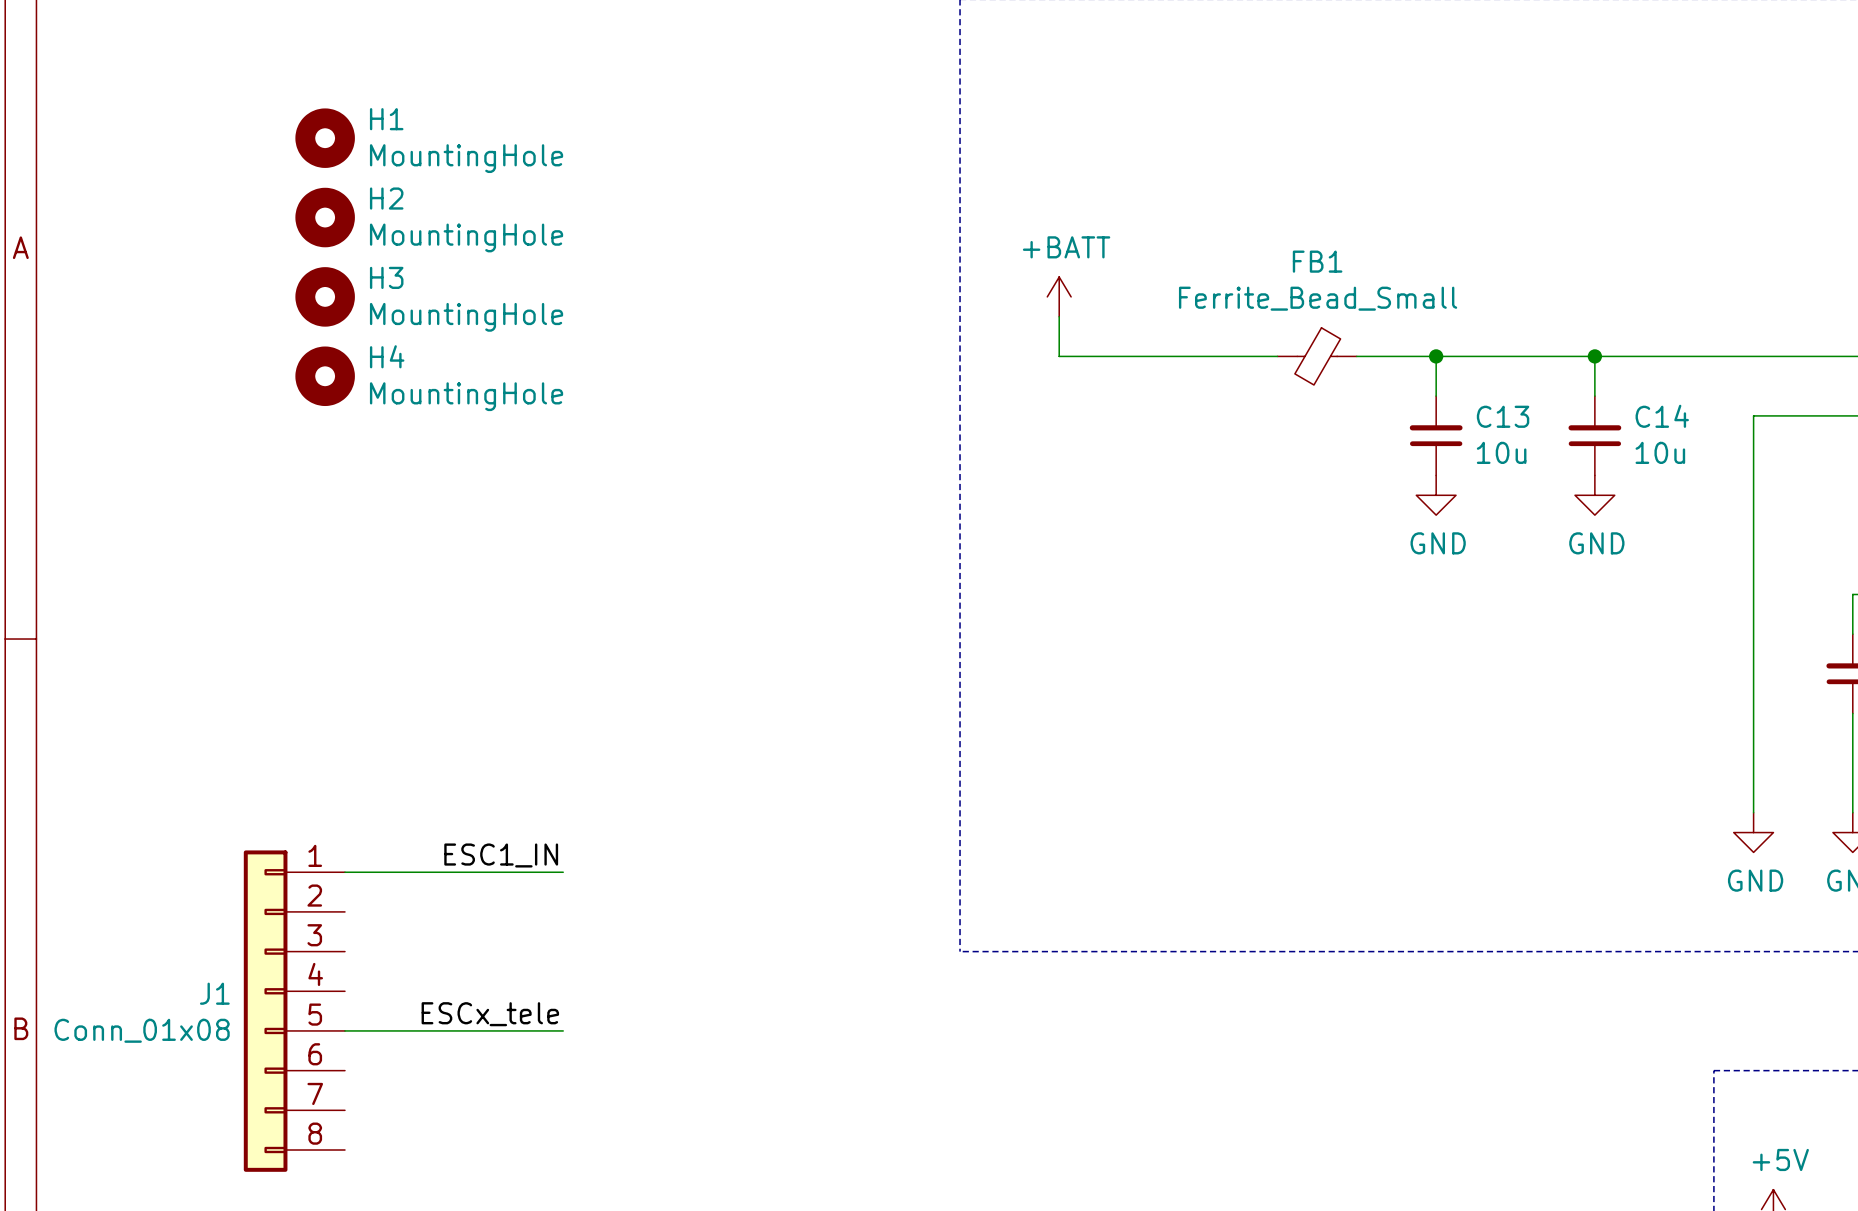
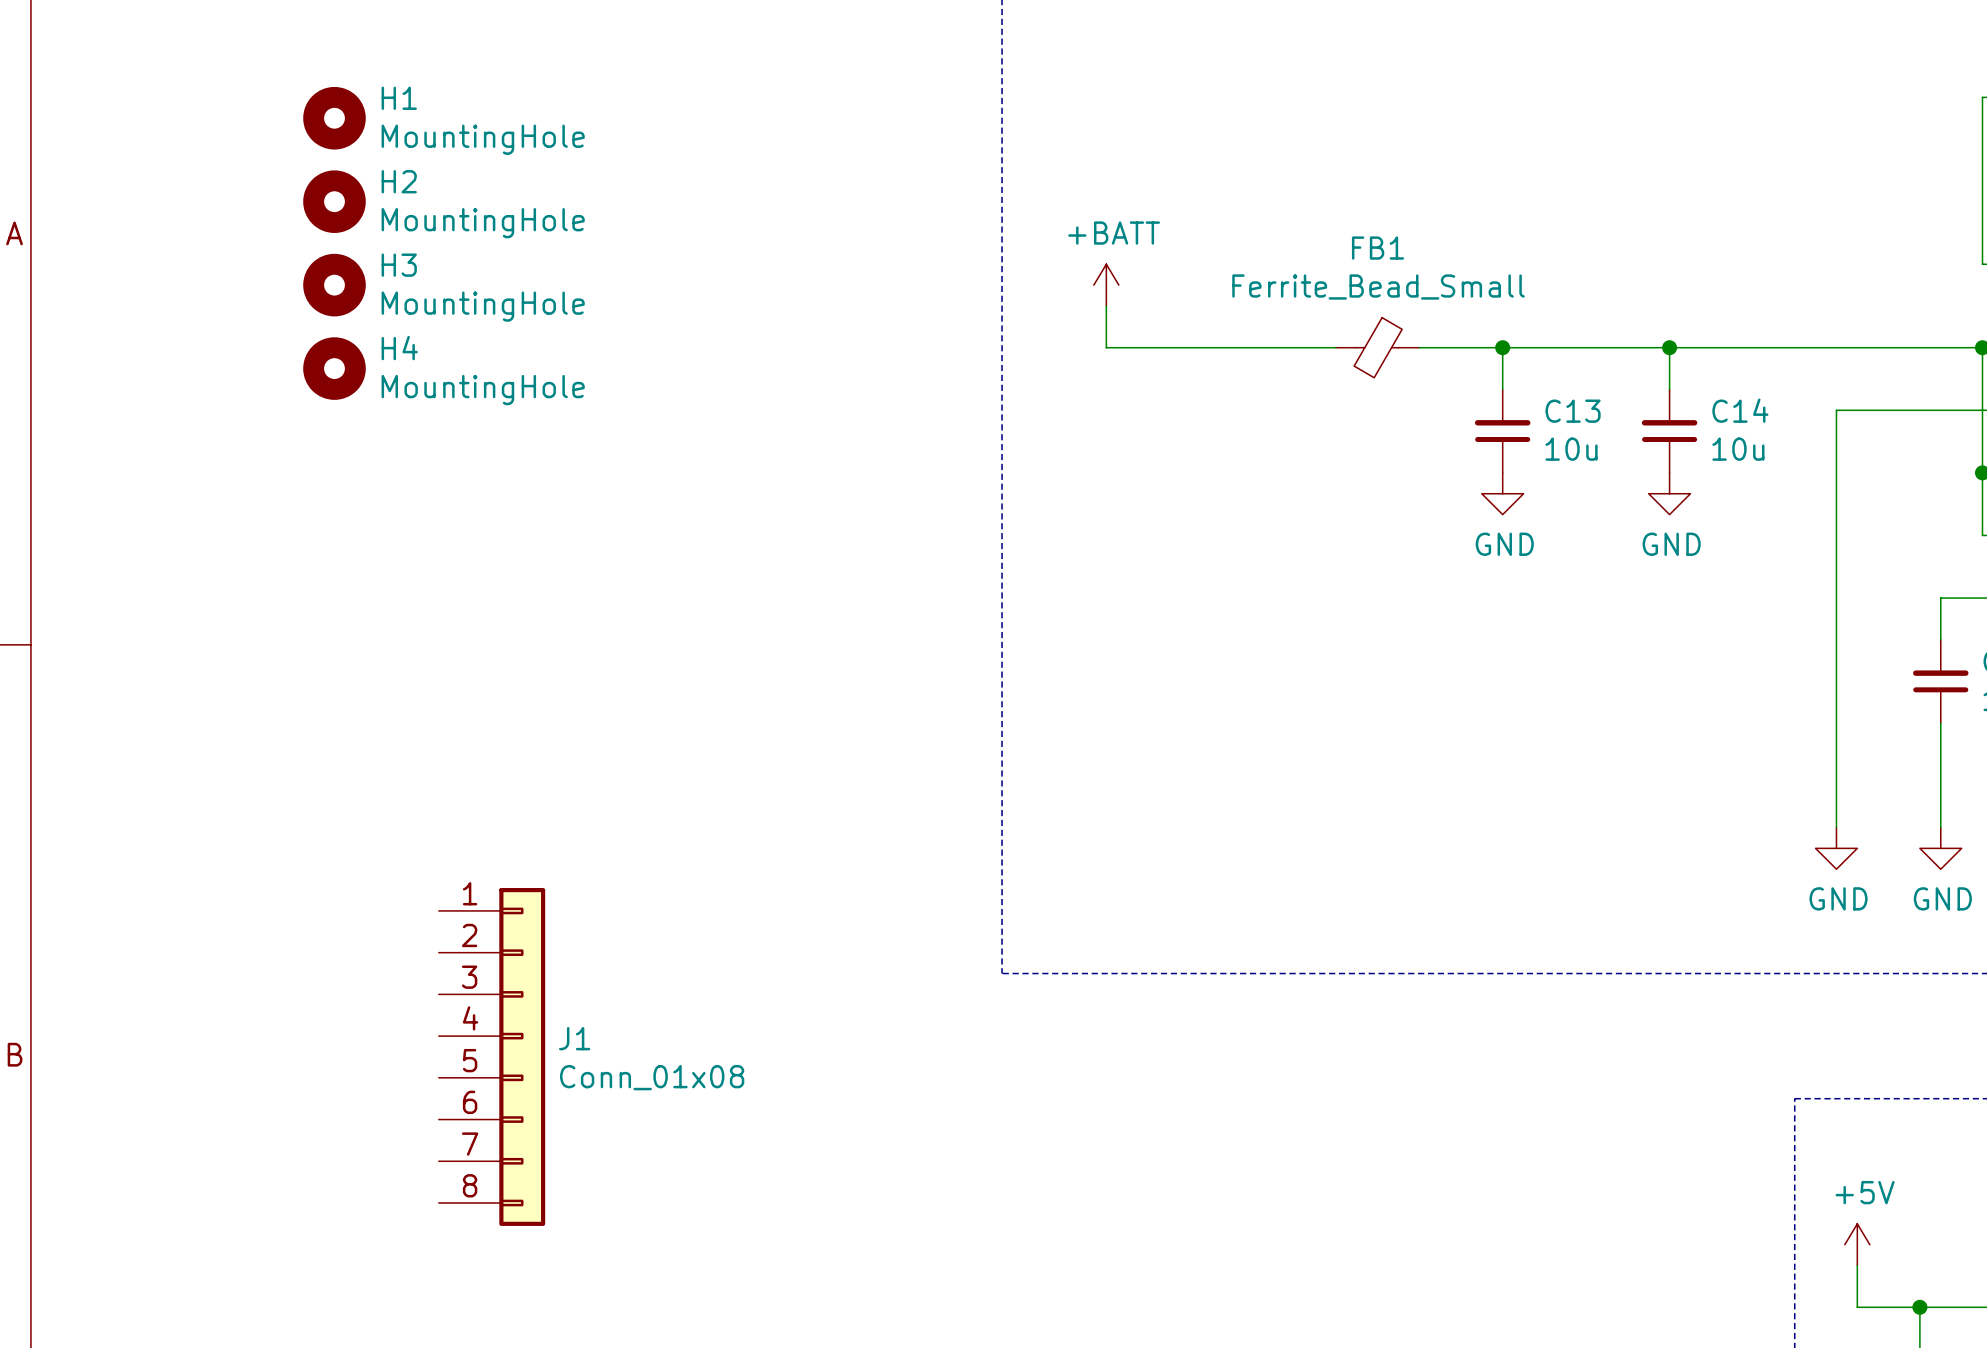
label: ESC1_IN (501, 855) -> none
wire: (344, 872) (563, 872) -> none
J1 flip: as is (265, 1011) -> left-right (522, 1056)
label: ESCx_tele (490, 1014) -> none
wire: (344, 1030) (563, 1030) -> none

